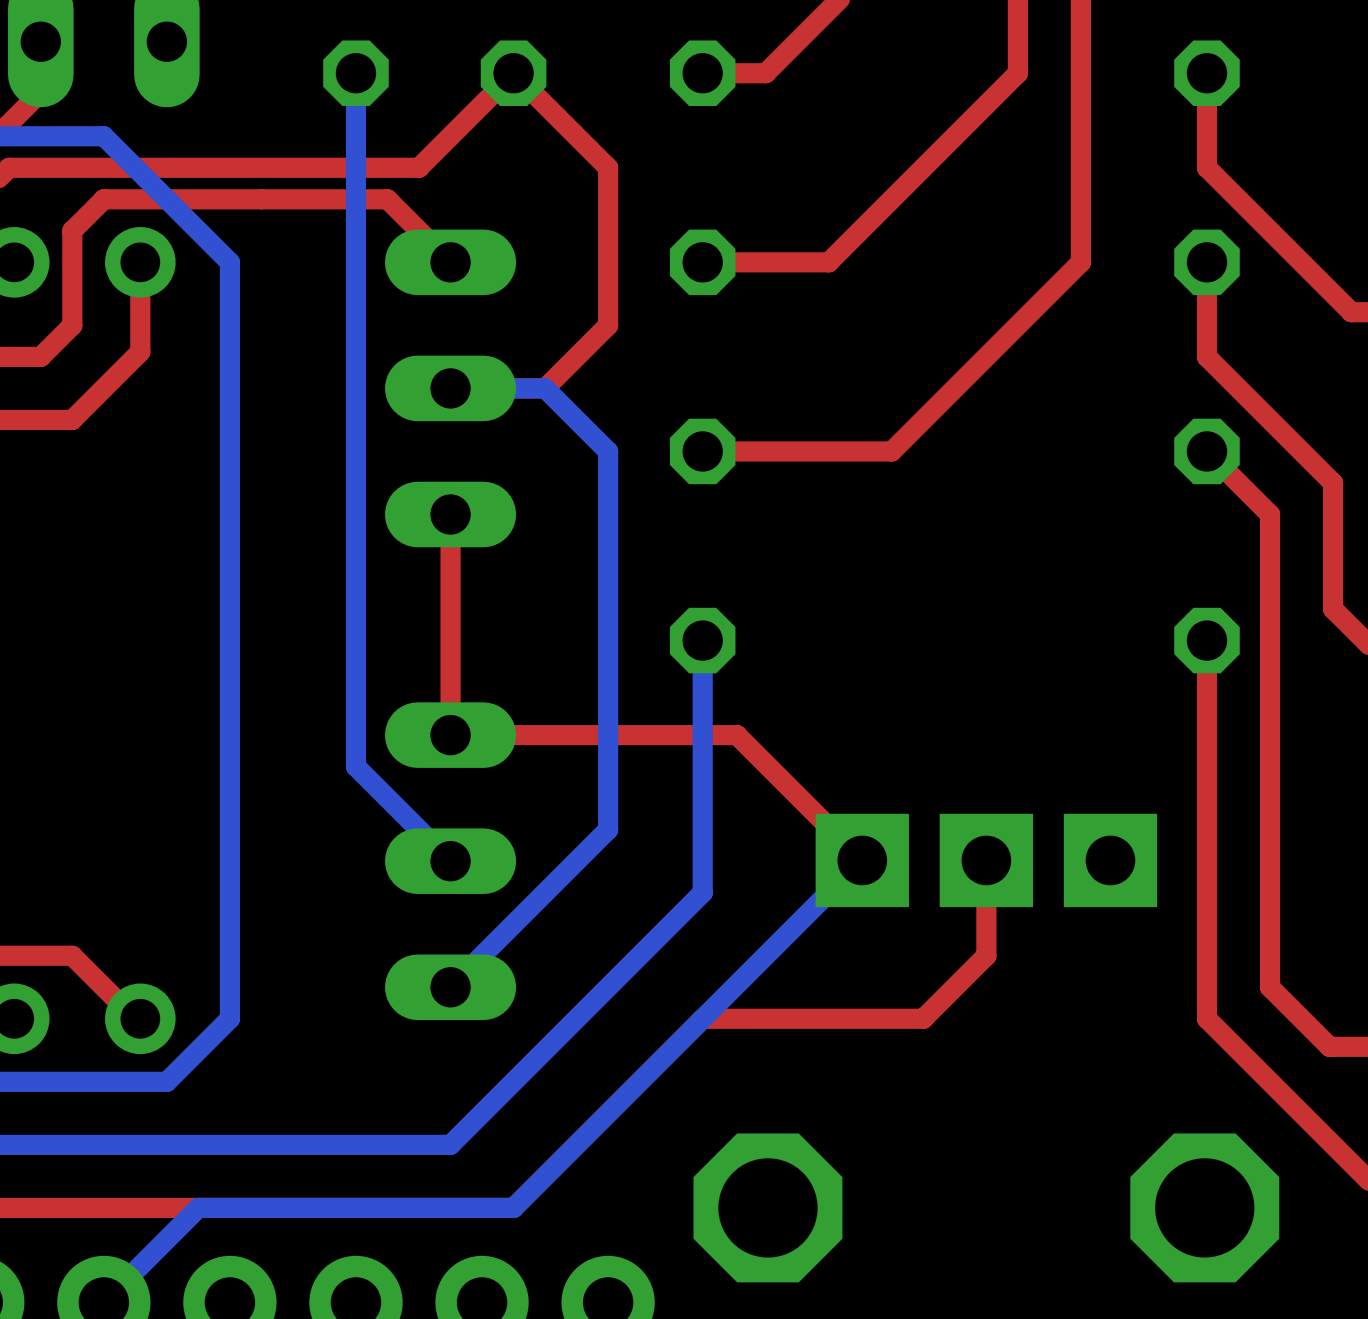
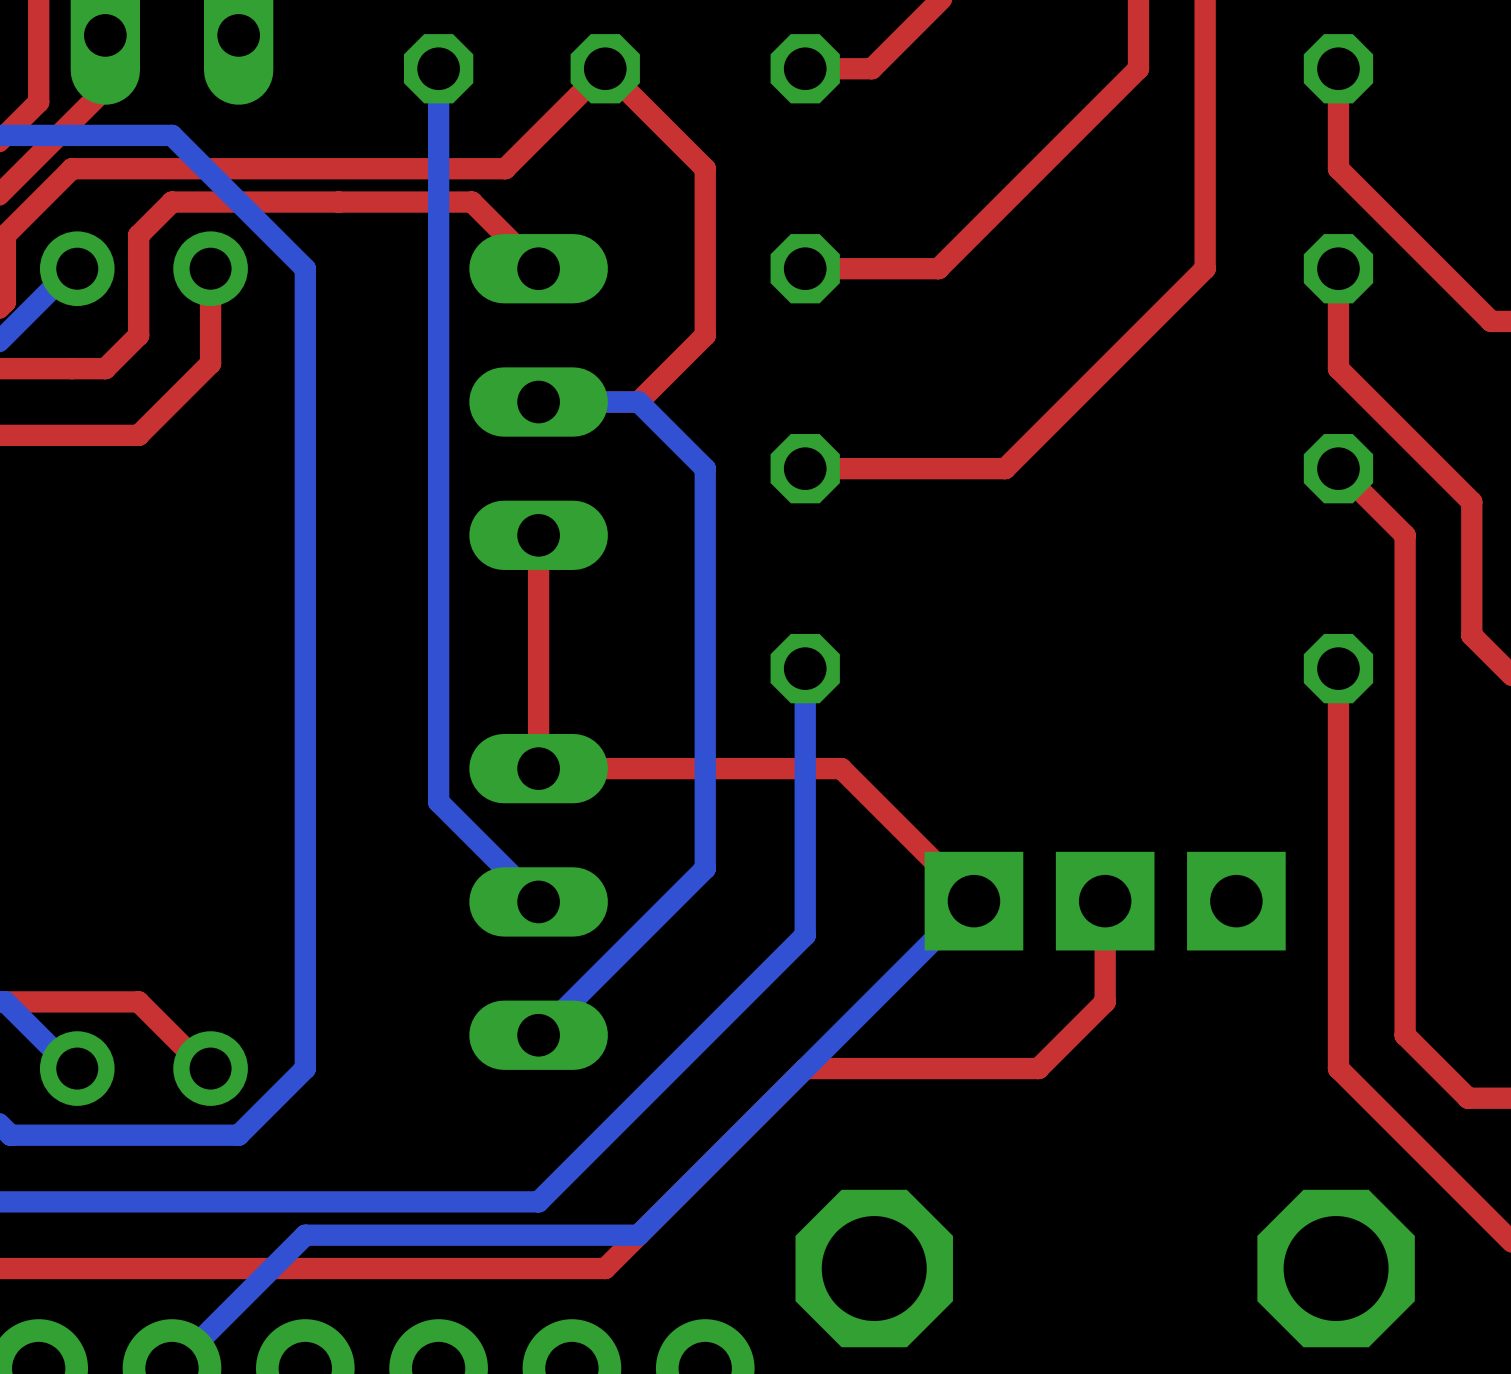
bottom track: (545, 1176) (513, 1207) (198, 1207) -> (638, 1235) (305, 1235) (271, 1268)

